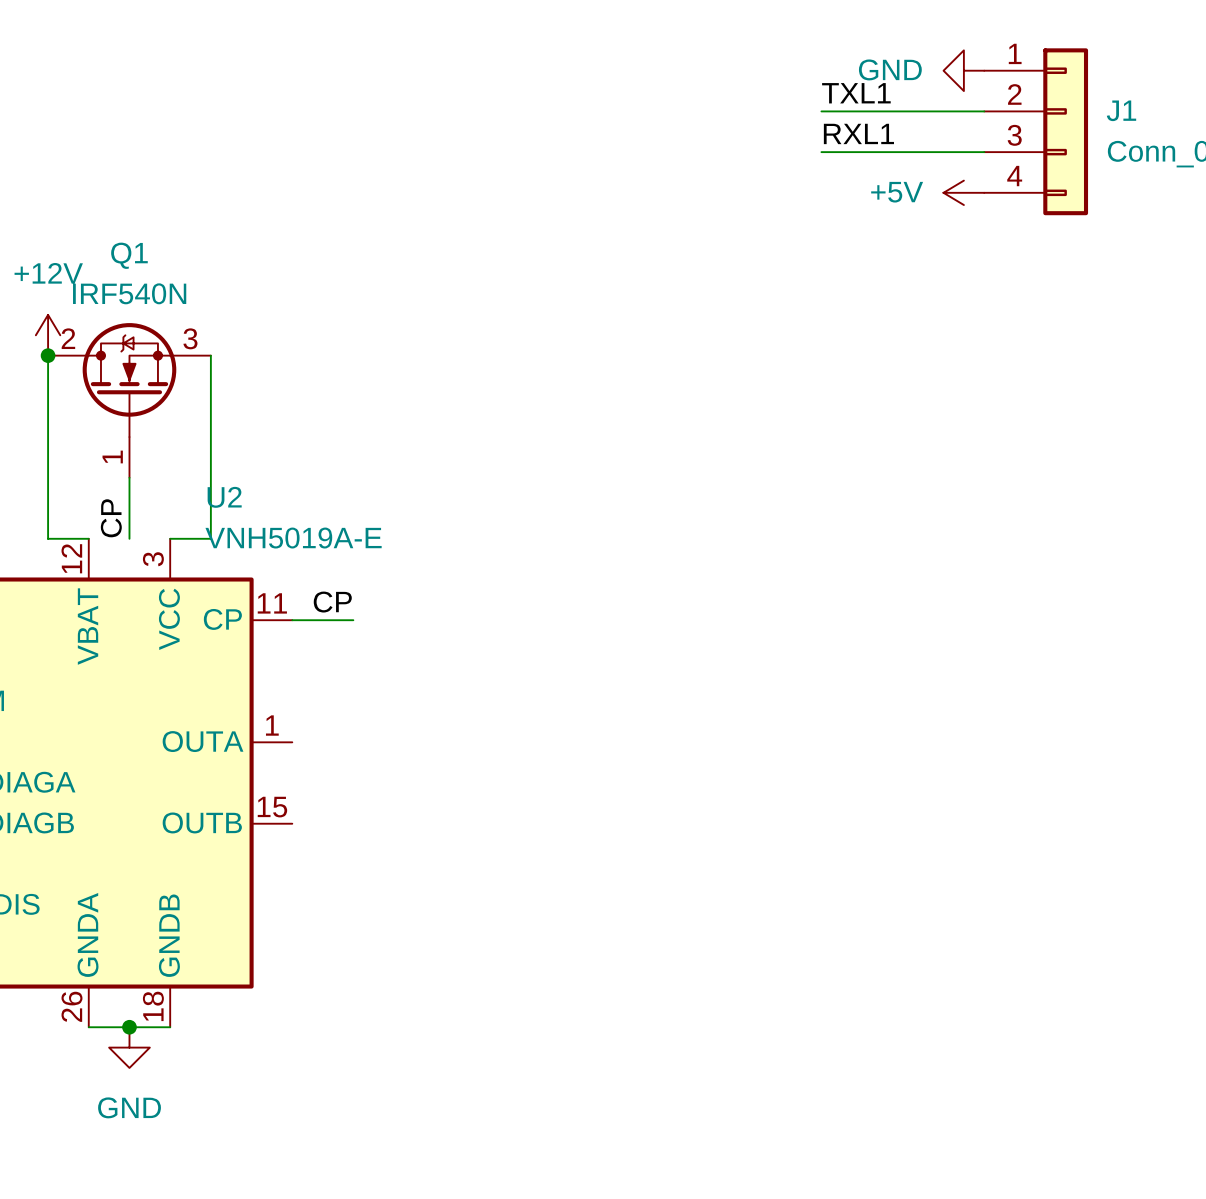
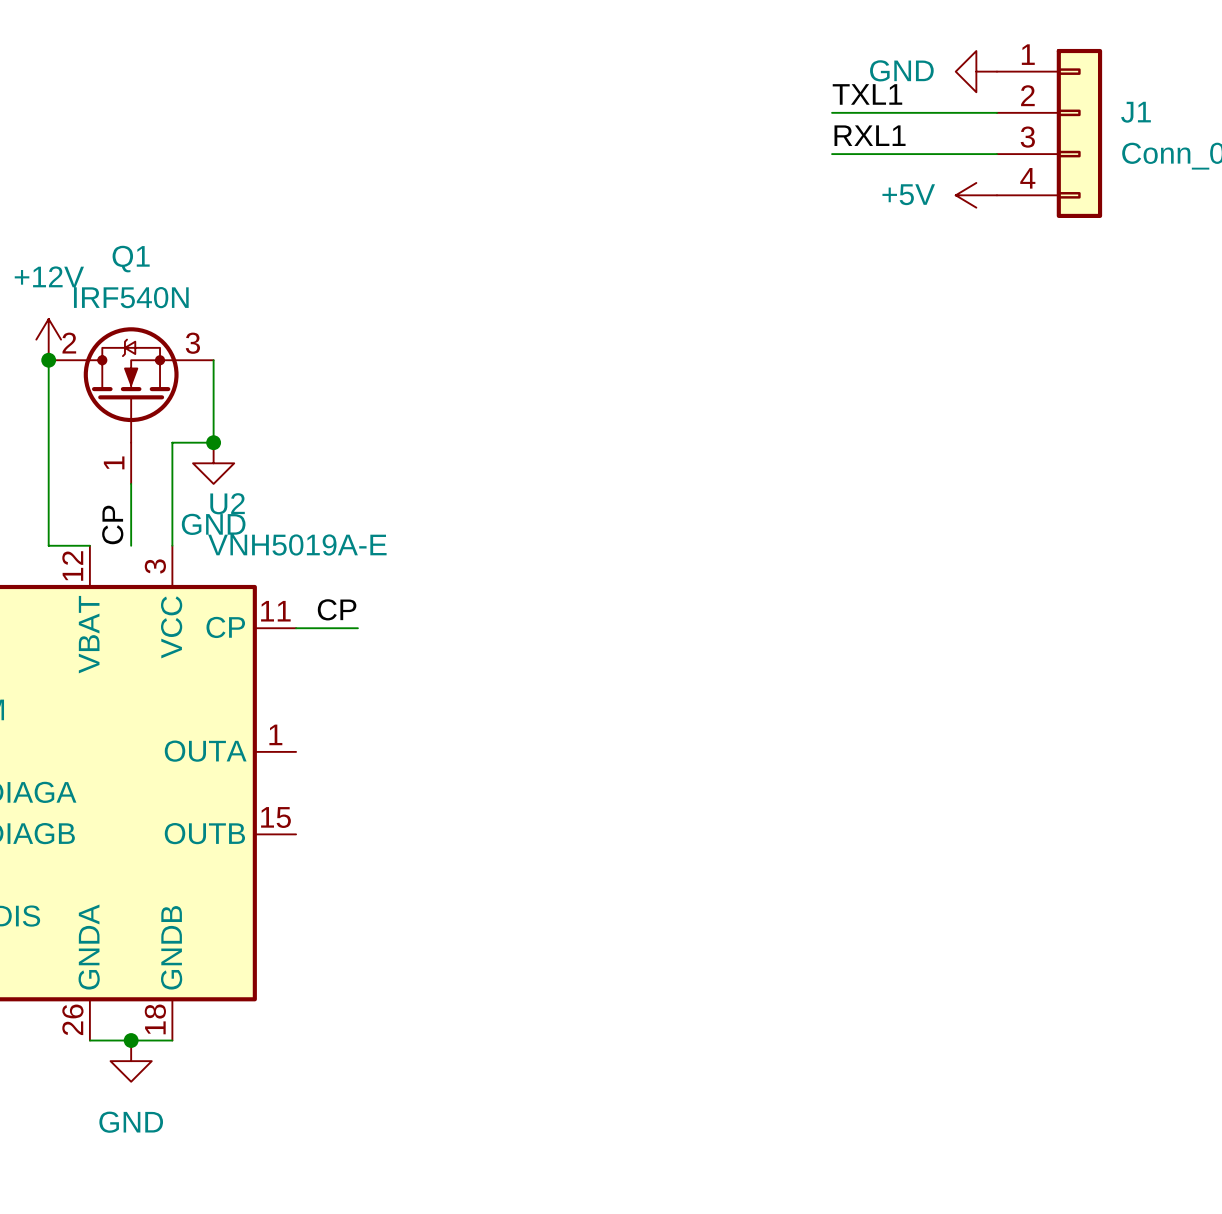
wire: (210, 437) (210, 538) (170, 538) -> (213, 442) (172, 442) (172, 545)
junction: none -> (213, 442)
power symbol: none -> GND (213, 463)

